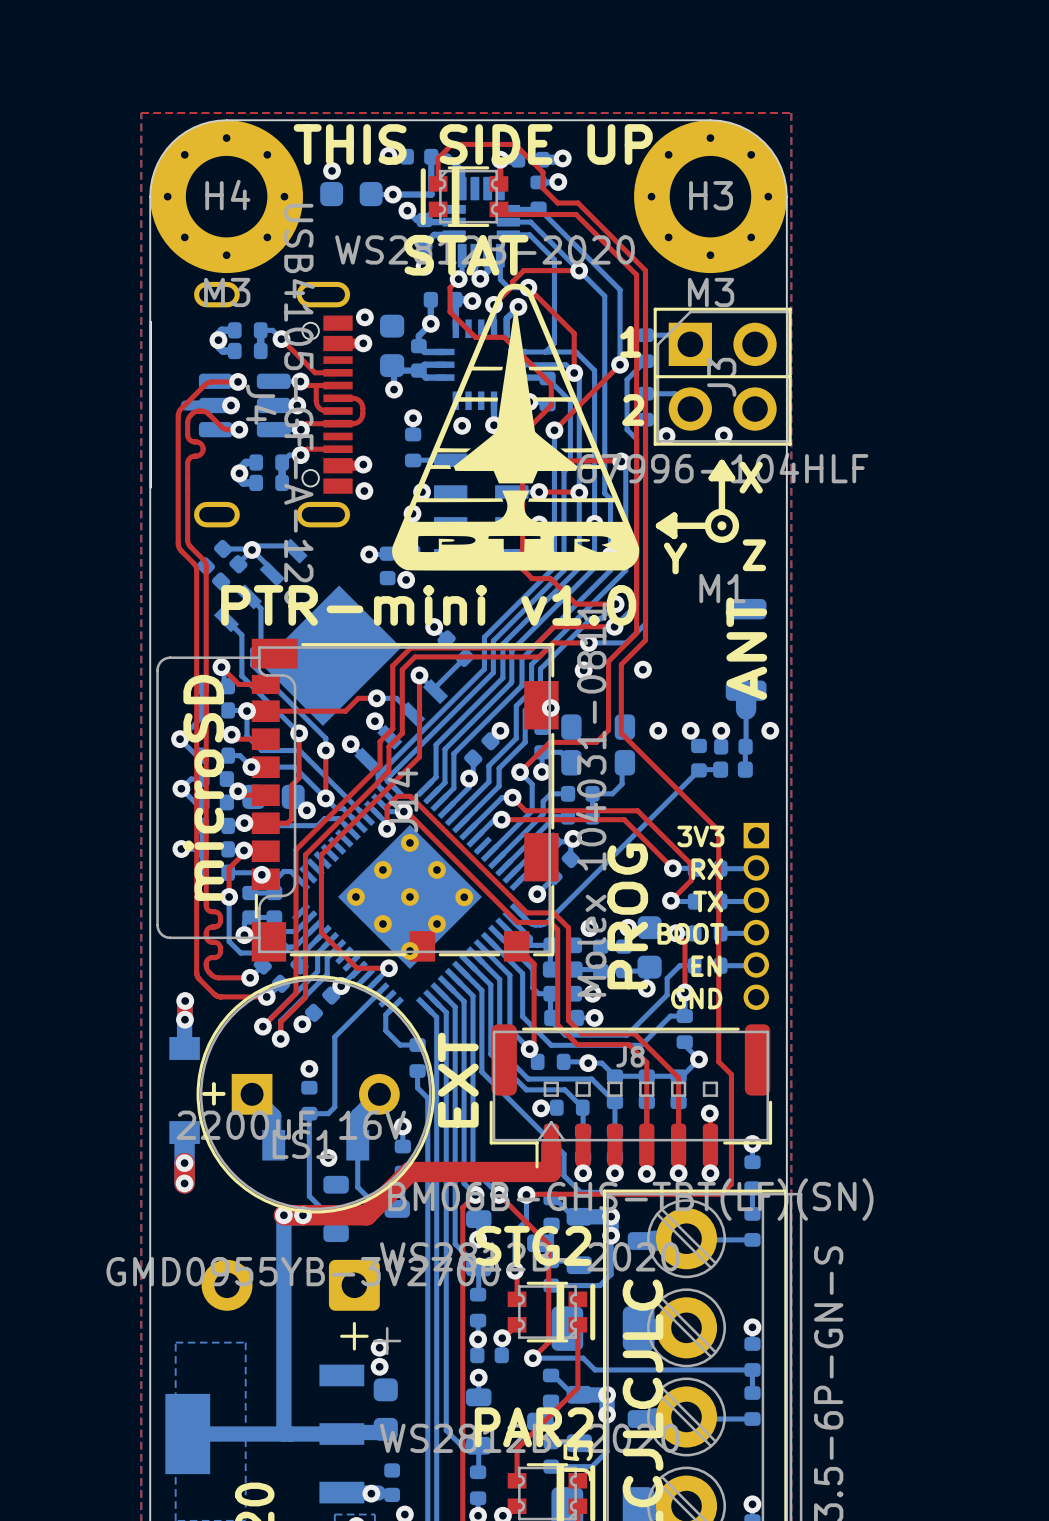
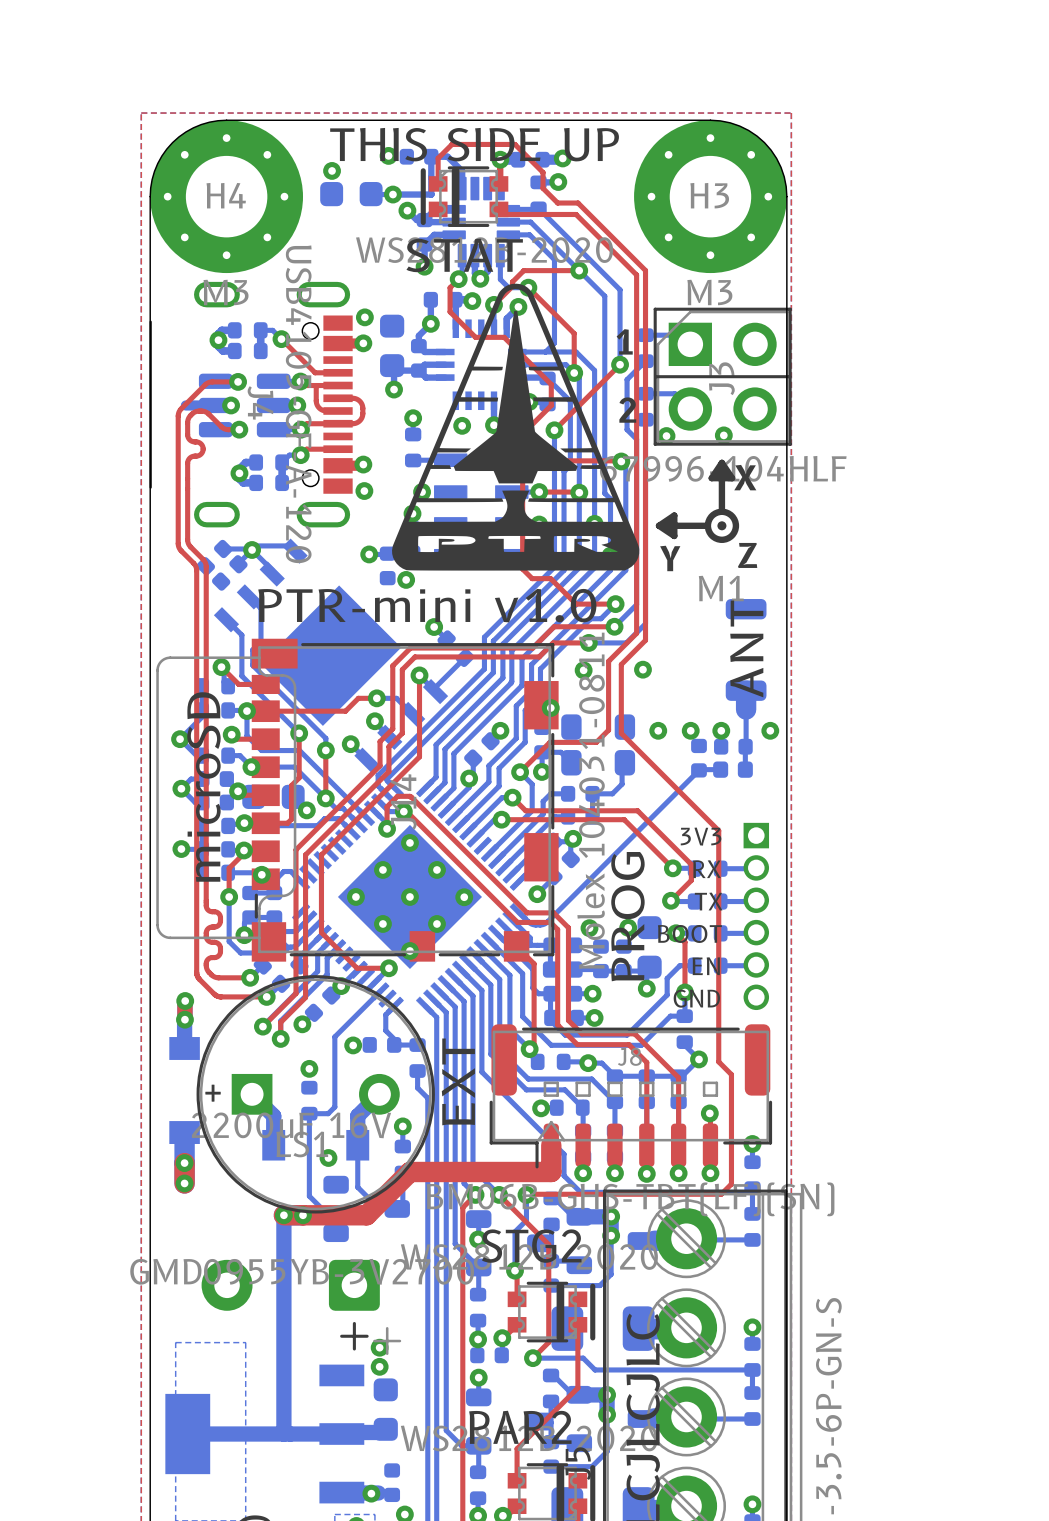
part: none -> (381, 1044)
via: none -> (353, 1045)

